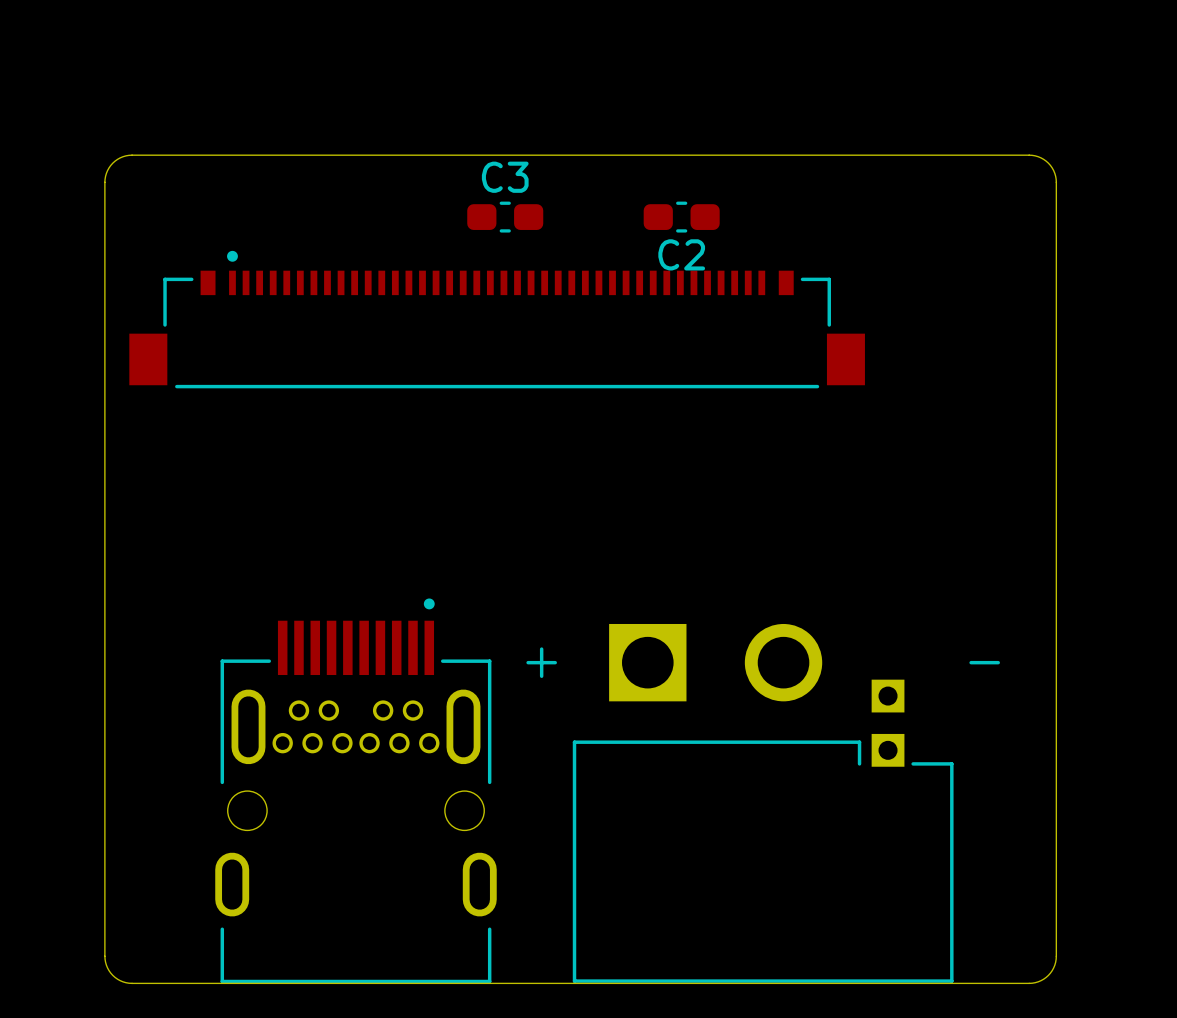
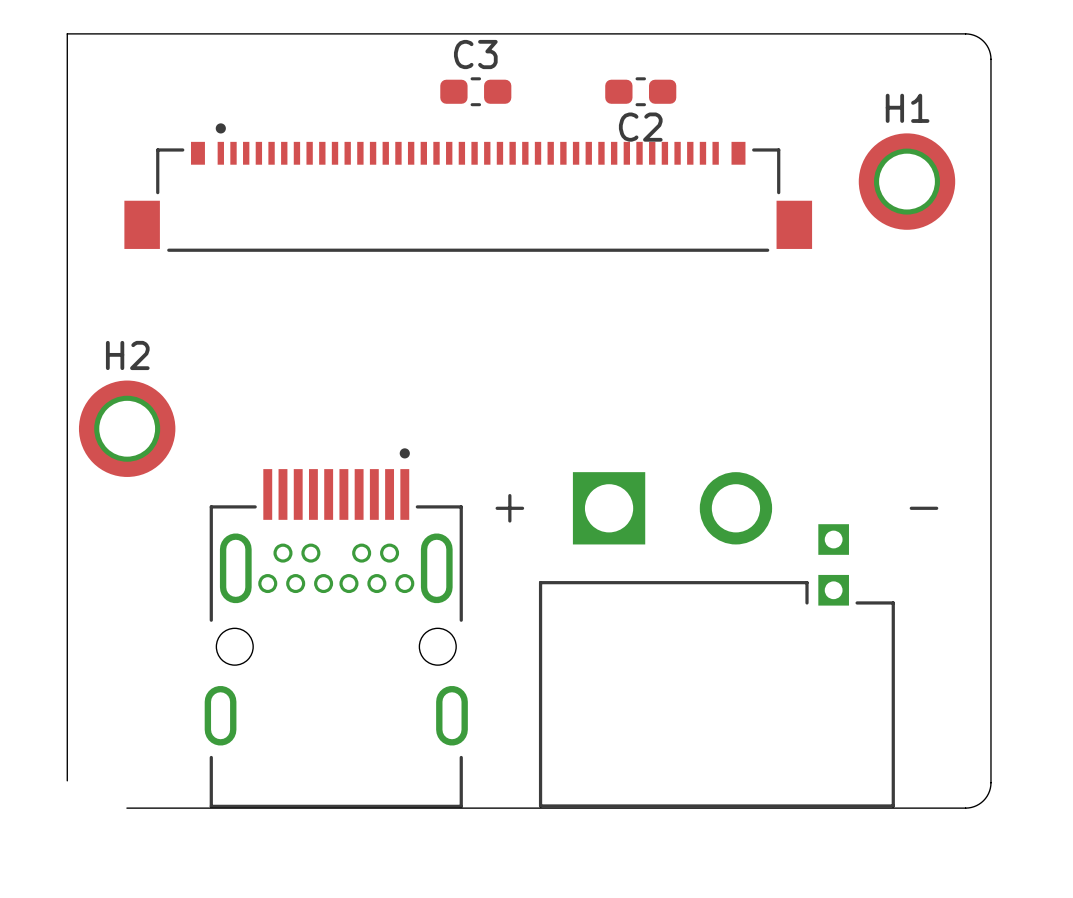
board edge: (132, 155) (120, 157) (112, 163) (107, 170) (104, 182) (104, 956) (107, 968) (112, 975) (120, 980) (132, 983) -> (126, 33) (67, 33) (67, 780)
H1: none -> (906, 181)
H2: none -> (127, 428)

